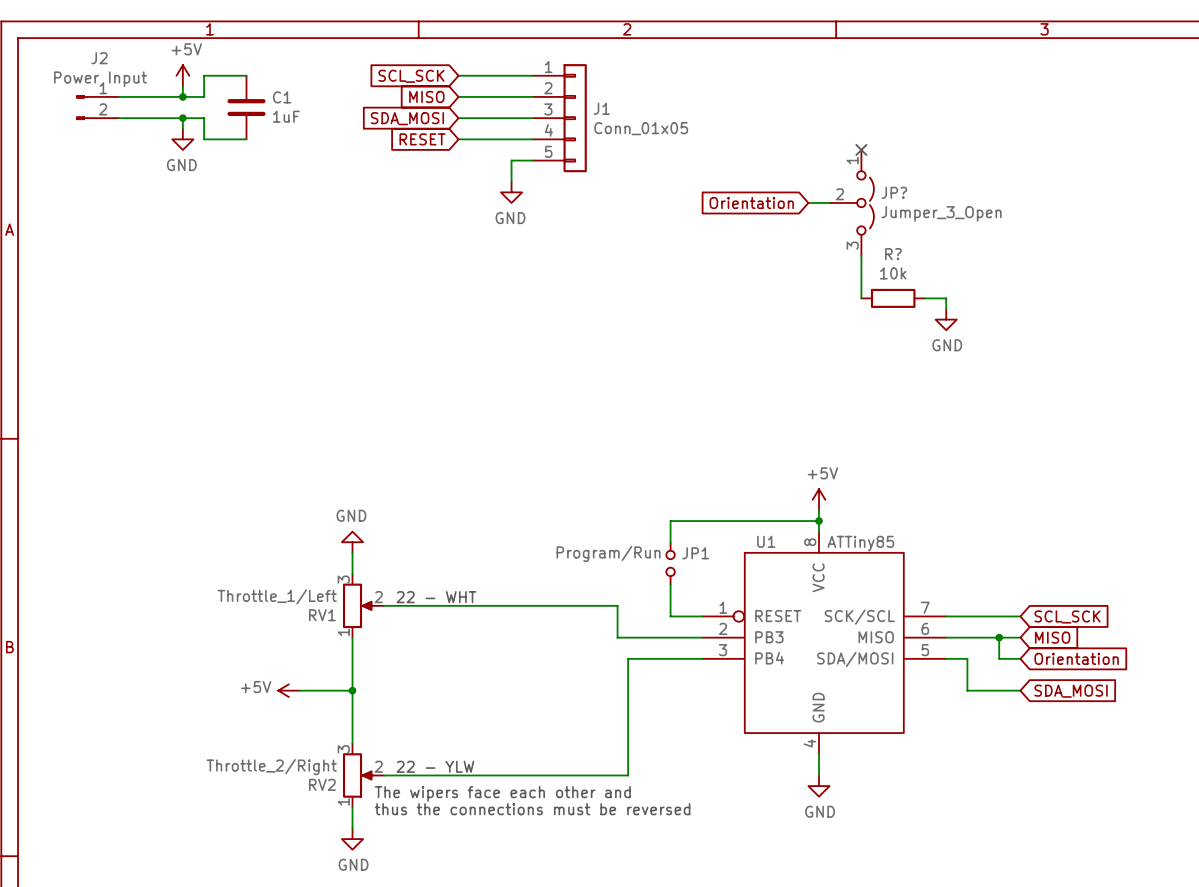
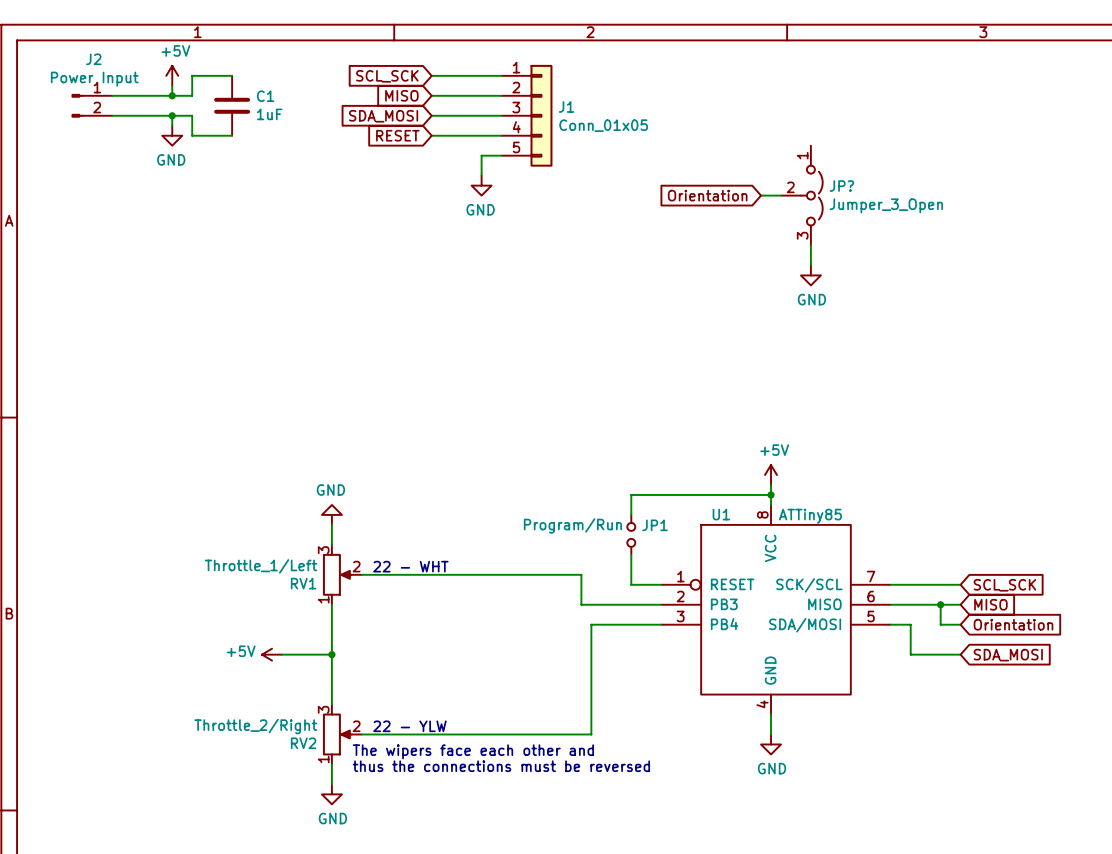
no-connect mark: (861, 149) -> none
R?: 10k (893, 298) -> none
wire: (925, 298) (946, 298) (946, 308) -> none
power symbol position: GND (946, 319) -> GND (810, 275)

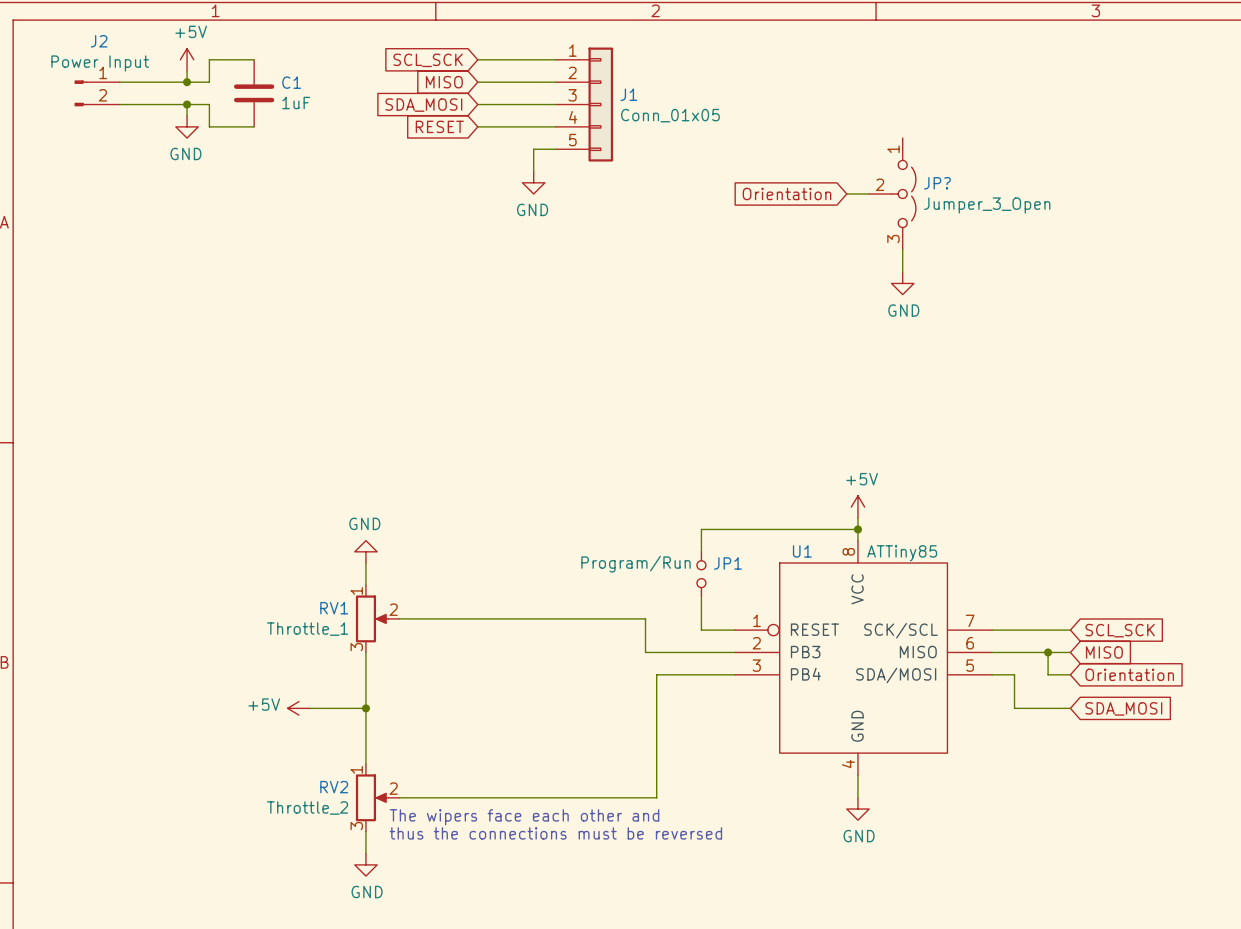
RV1 value: Throttle_1/Left (261, 566) -> Throttle_1 (307, 629)
text: 22 - WHT (410, 566) -> none
RV1 flip: as is (337, 574) -> up-down (372, 618)
RV2 value: Throttle_2/Right (255, 726) -> Throttle_2 (307, 808)
text: 22 - YLW (409, 726) -> none
RV2 flip: as is (337, 734) -> up-down (372, 797)

